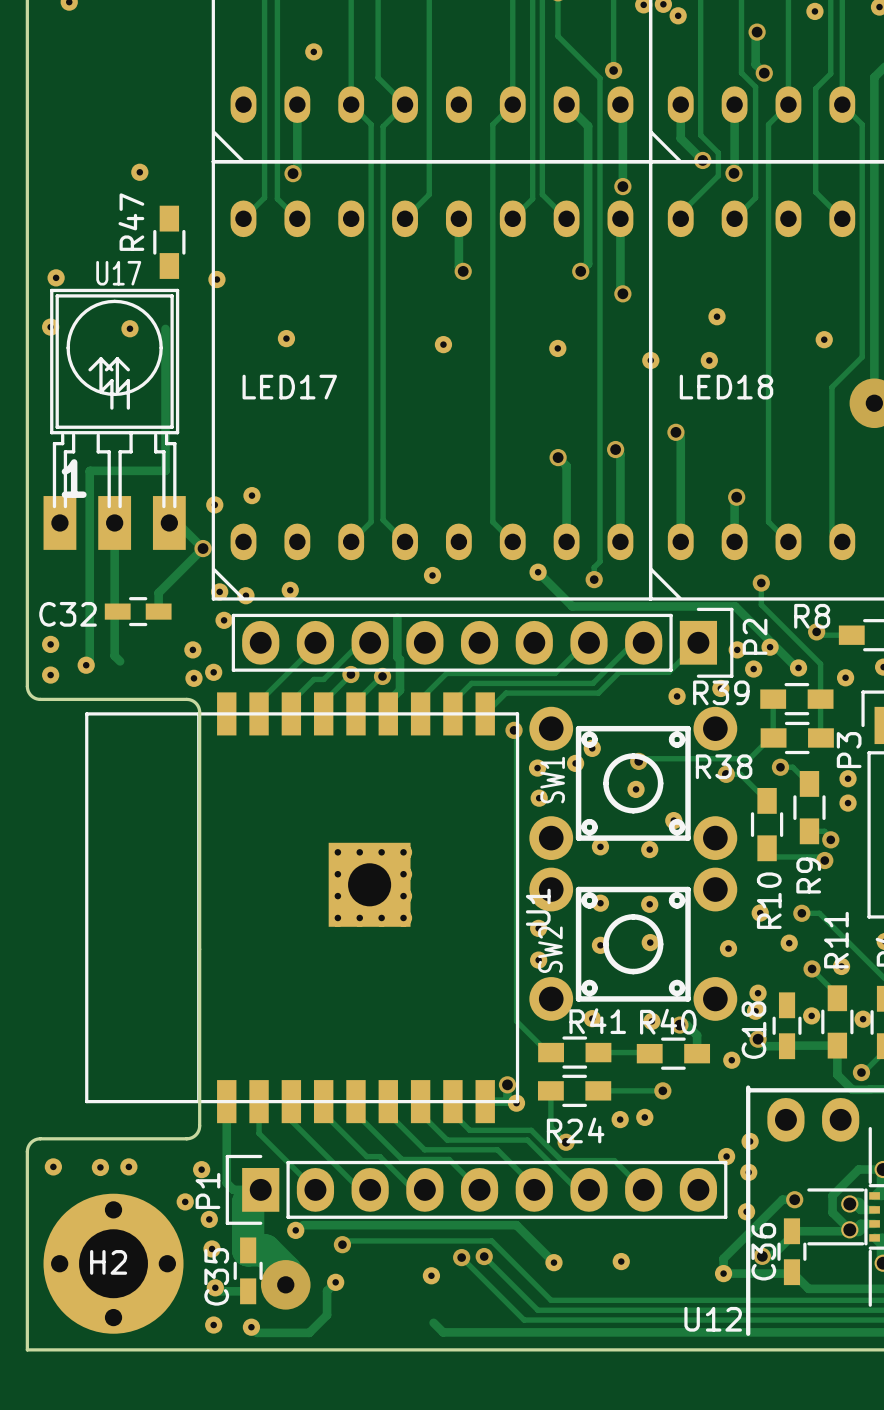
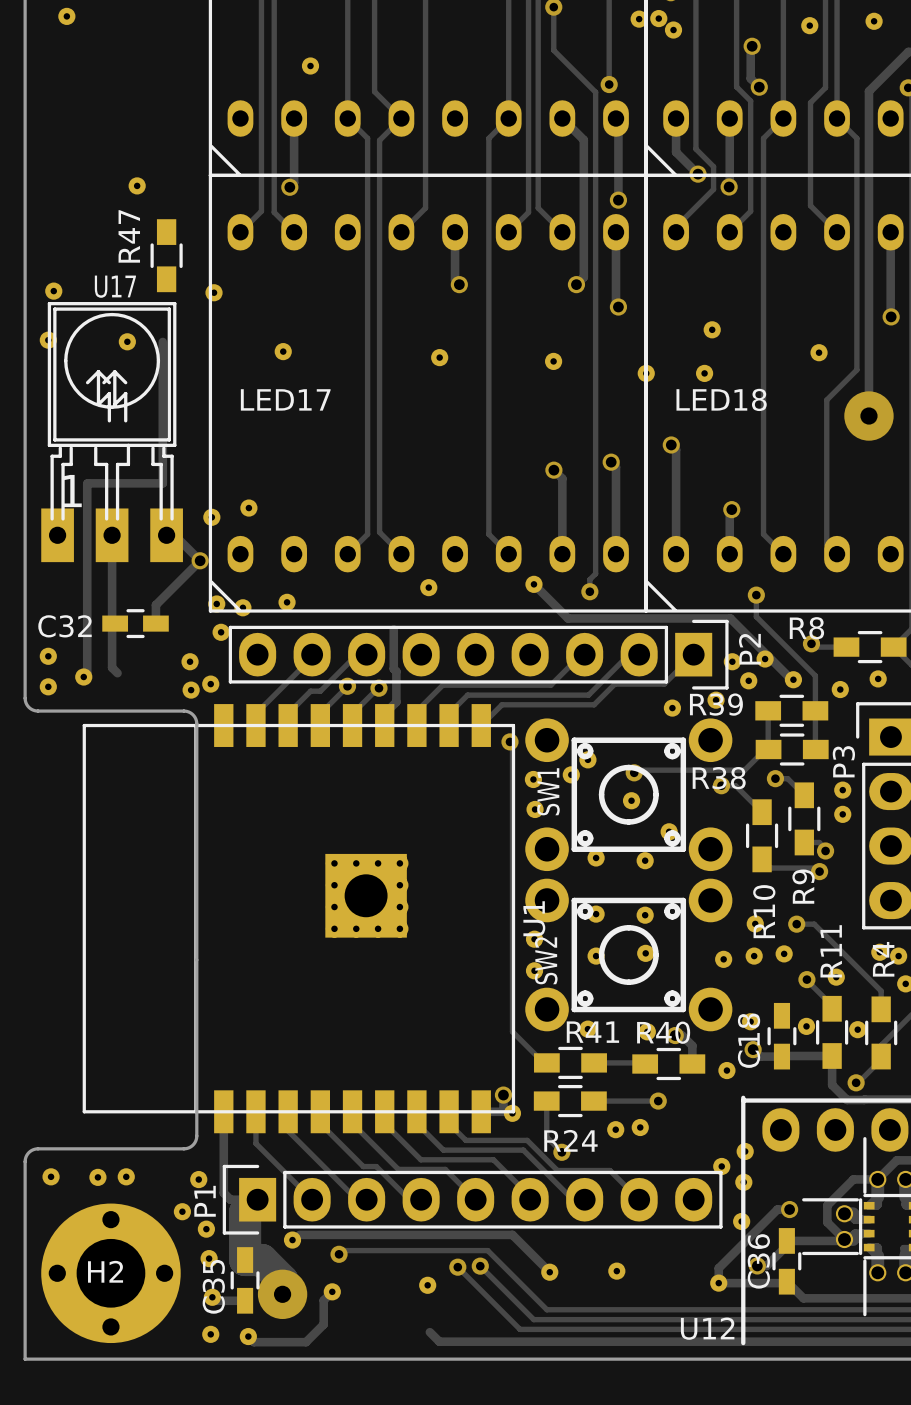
part position: (758, 993) -> (754, 956)

